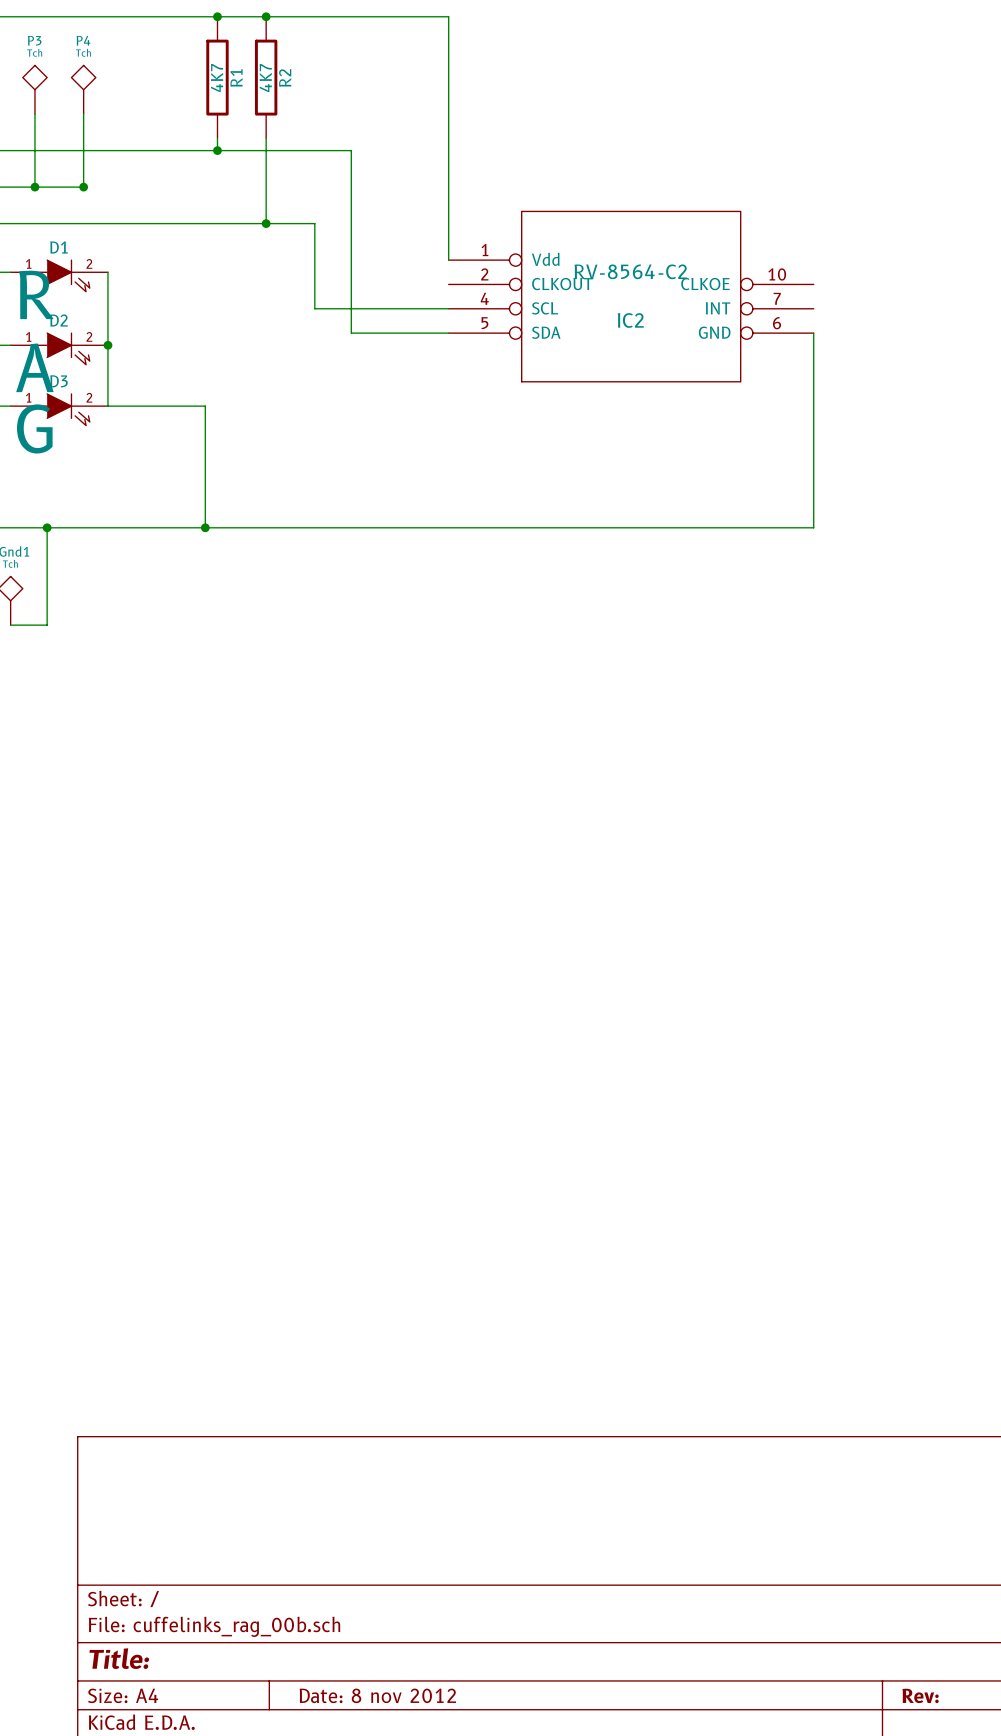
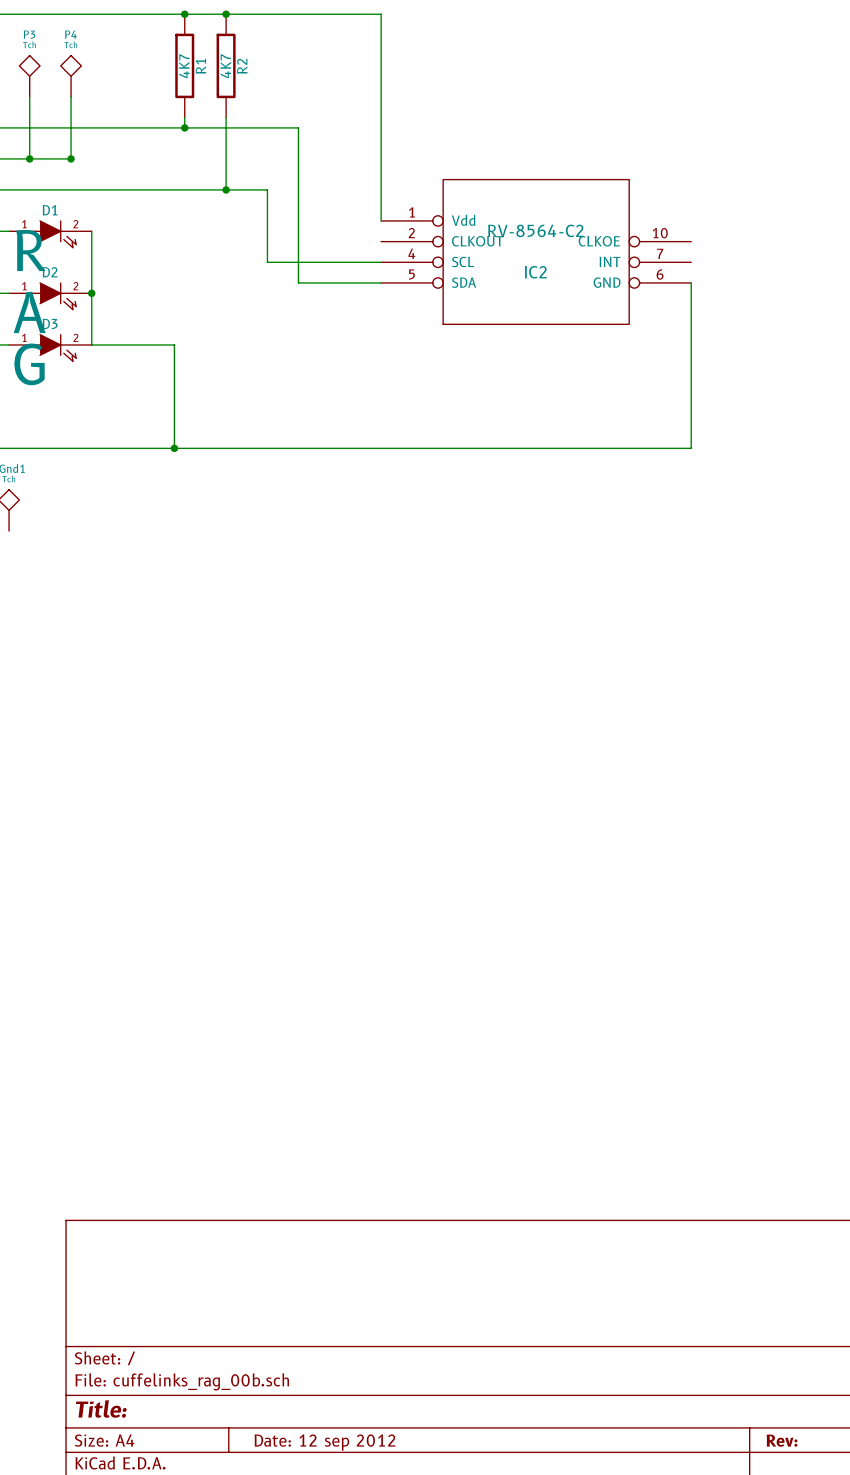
wire: (47, 527) (47, 625) (10, 625) -> none
junction: (47, 527) -> none
title block: Date: 8 nov 2012 (377, 1695) -> Date: 12 sep 2012 (324, 1442)

